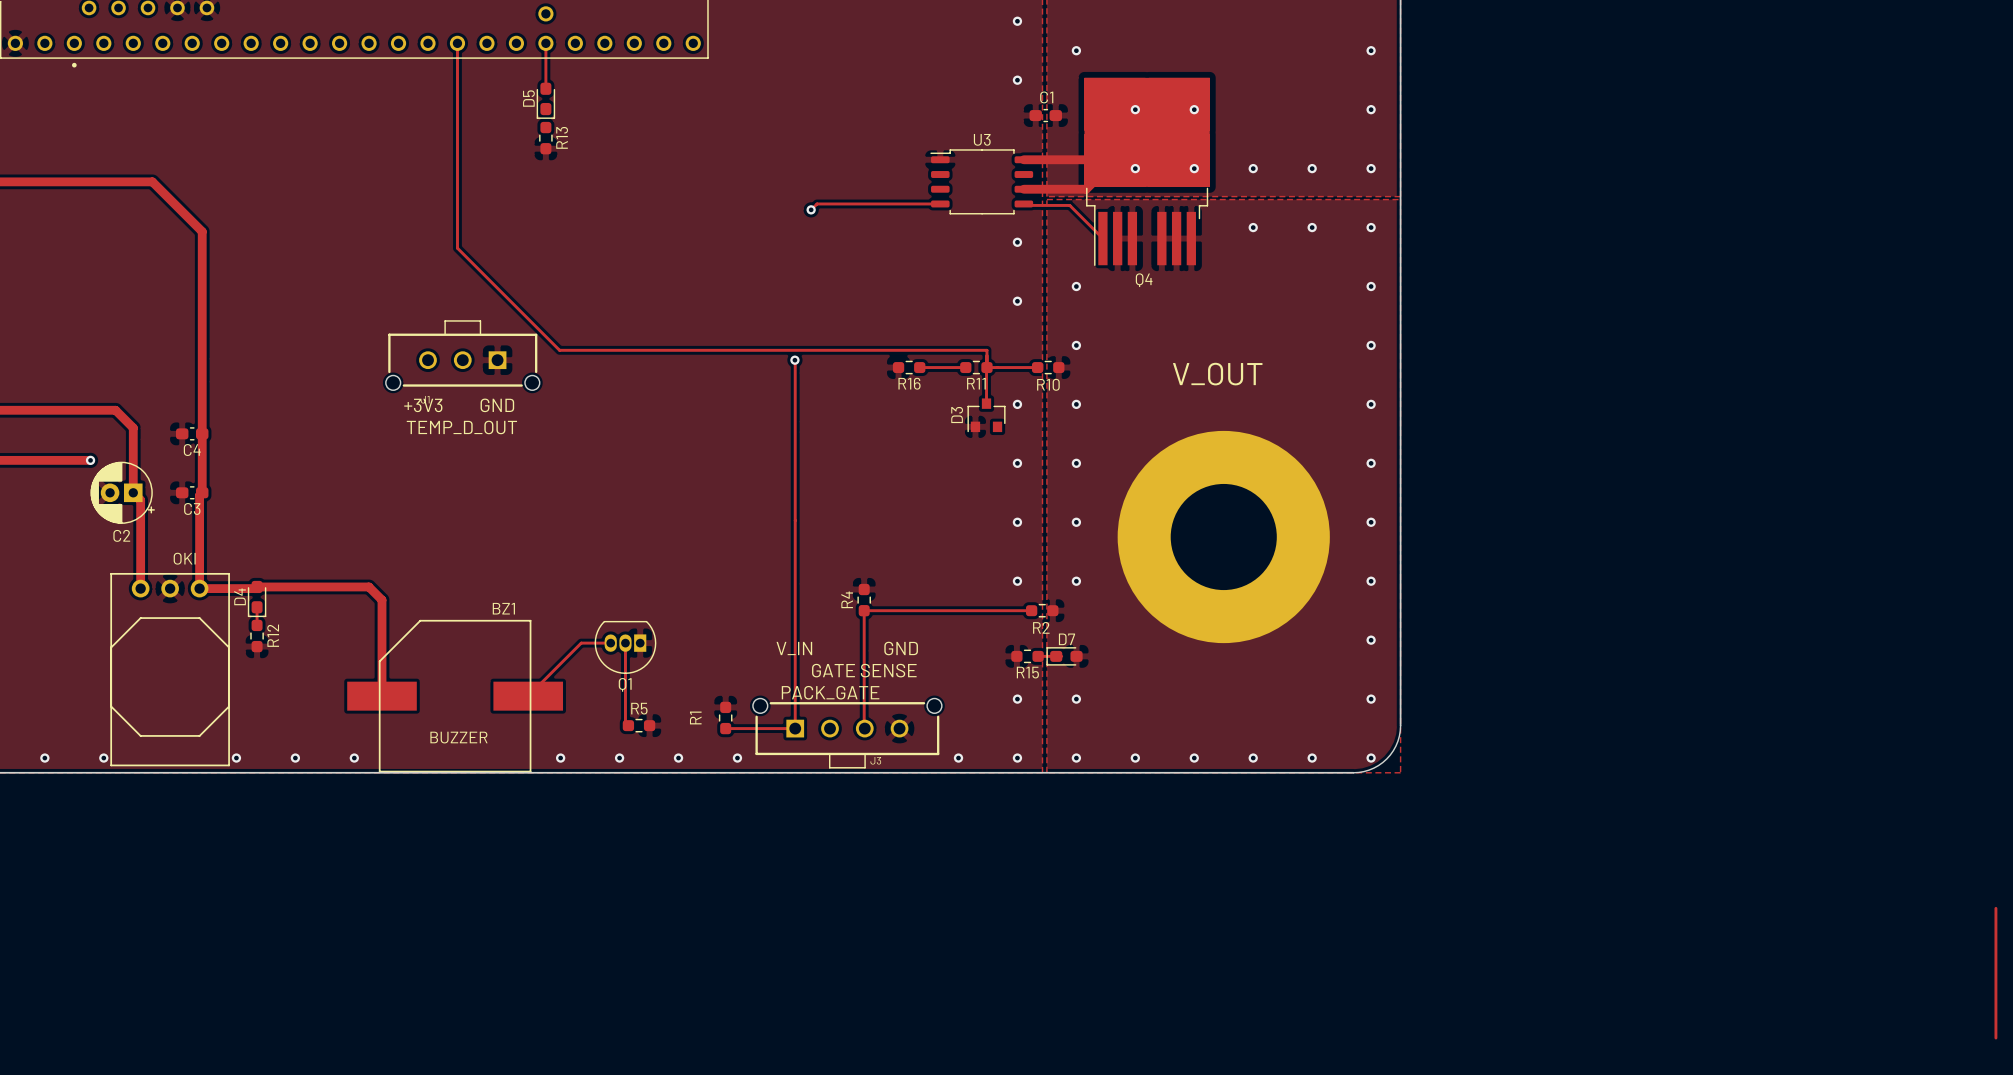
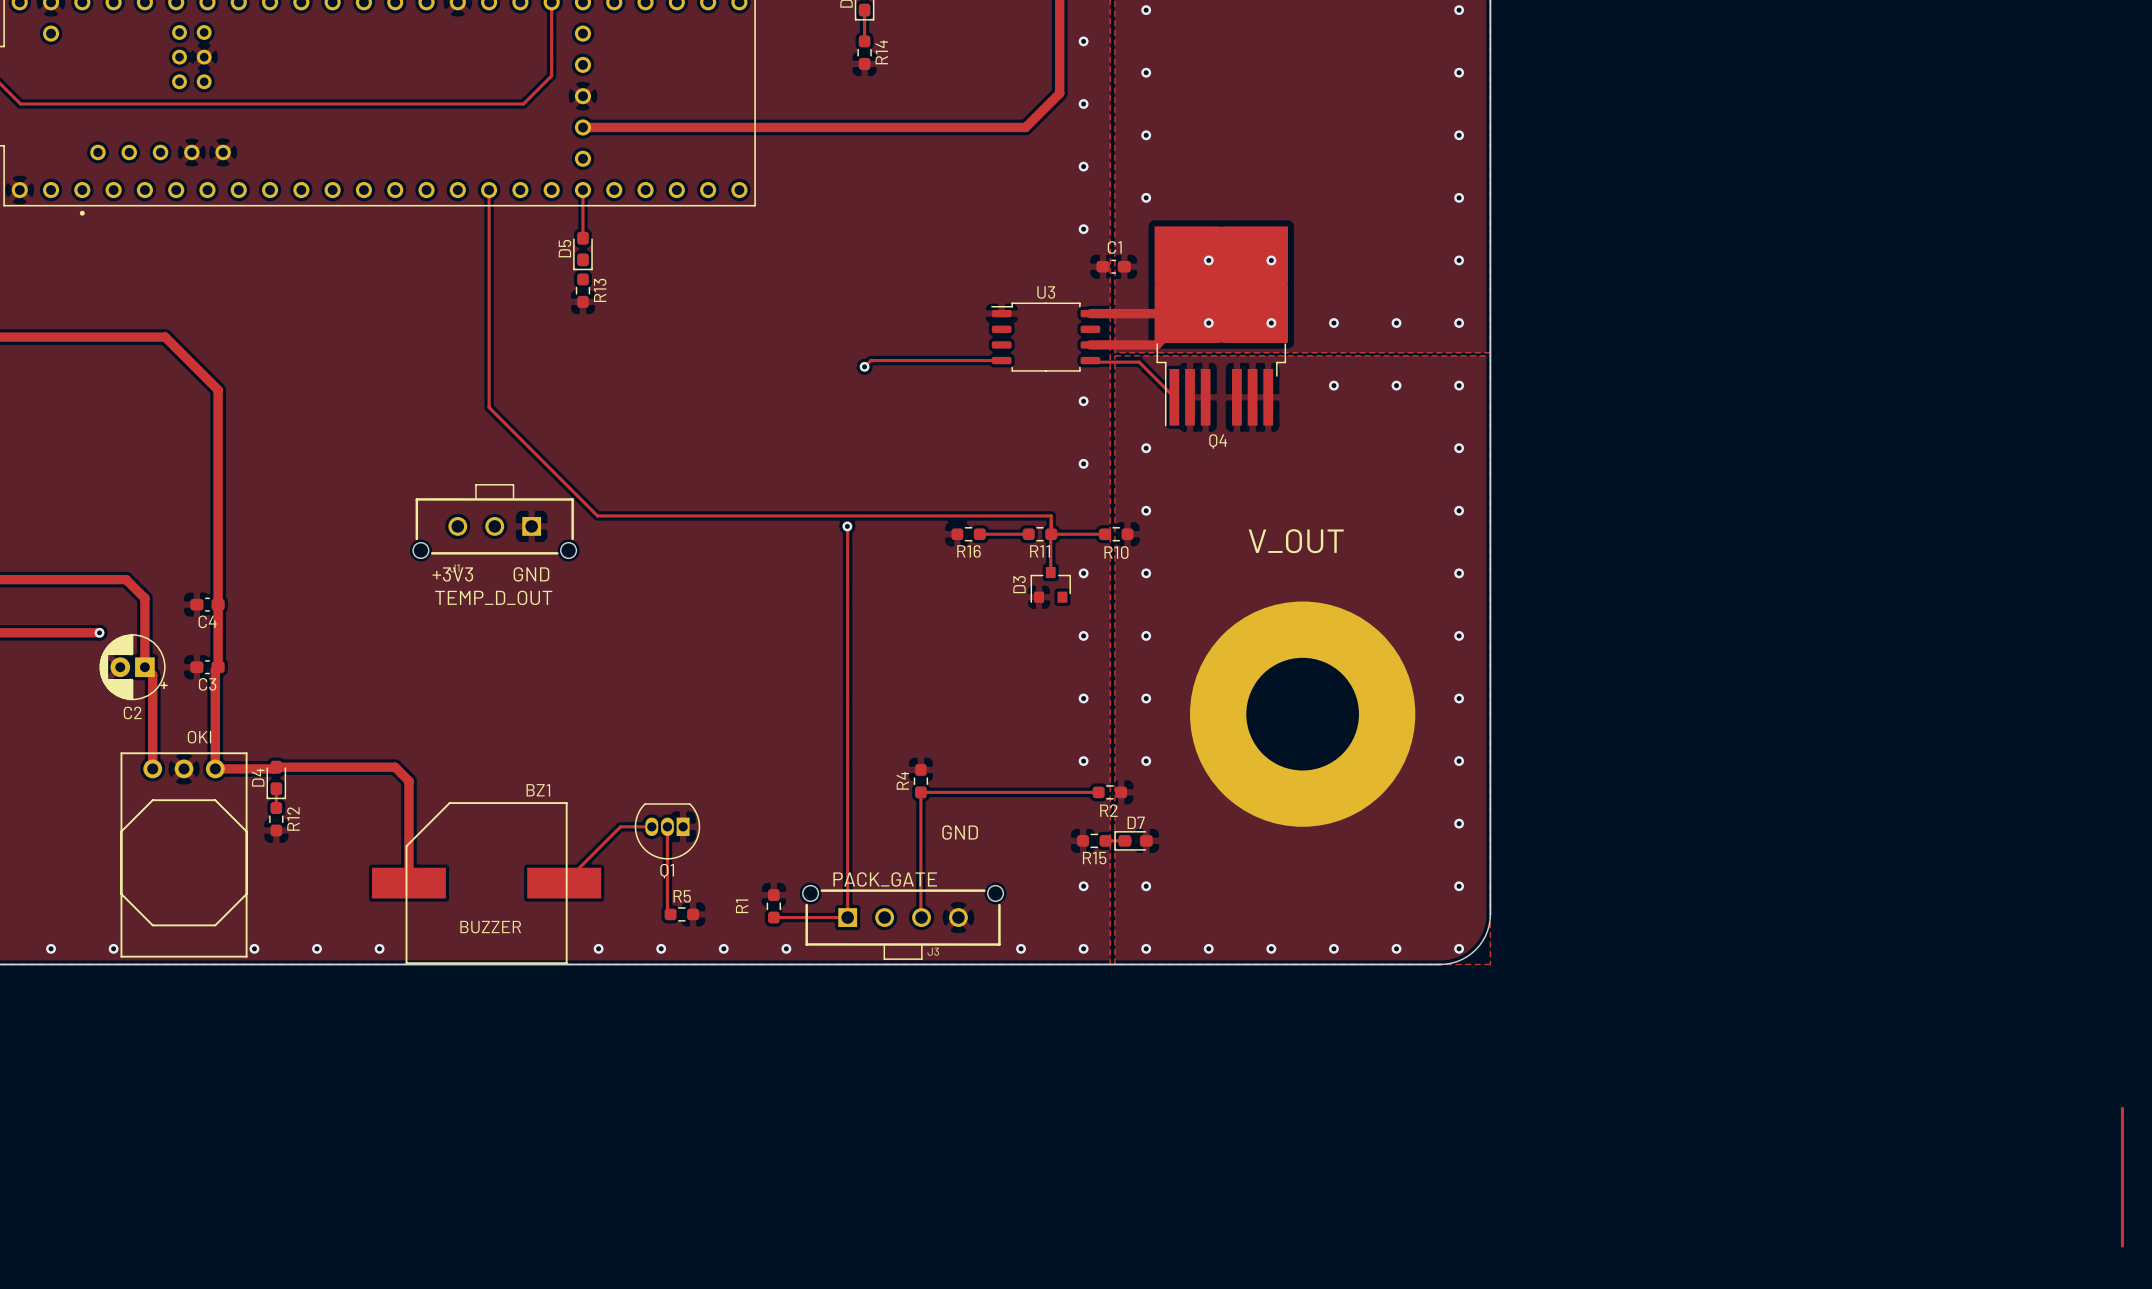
text: V_IN (794, 648) -> none
text: GATE SENSE (864, 670) -> none

